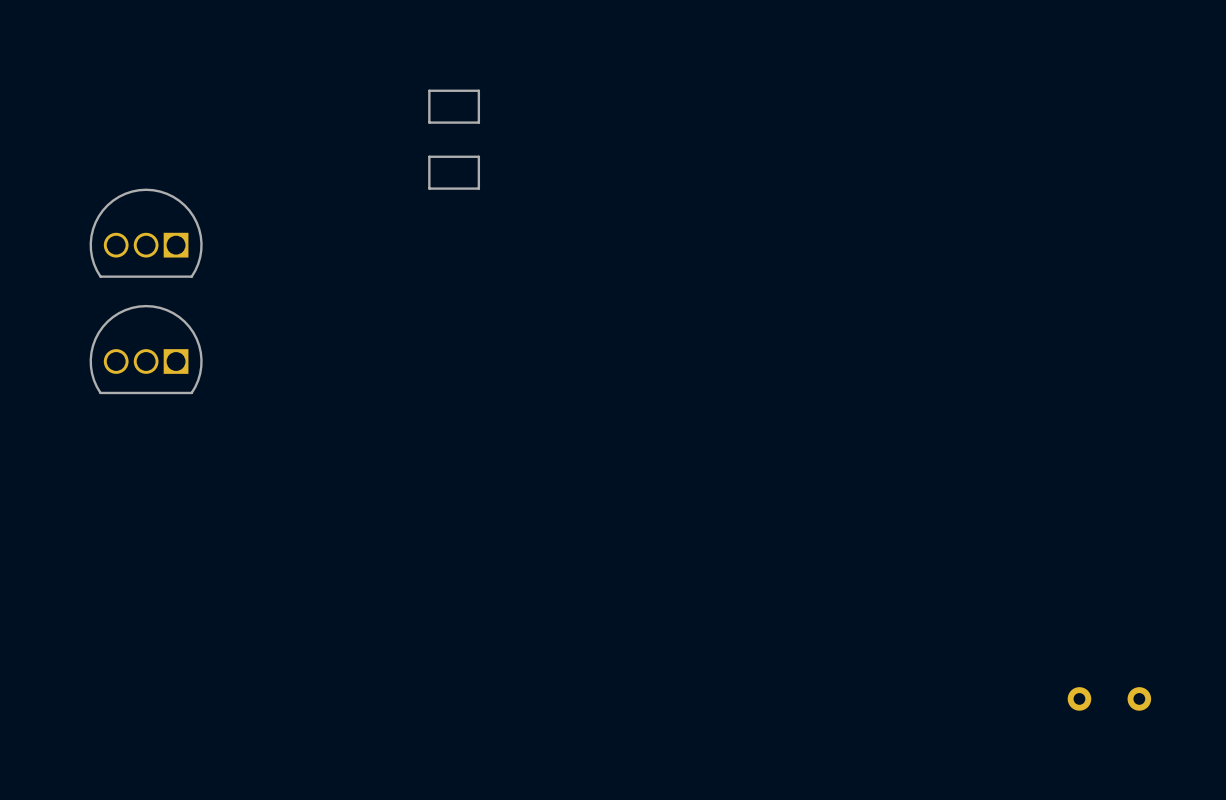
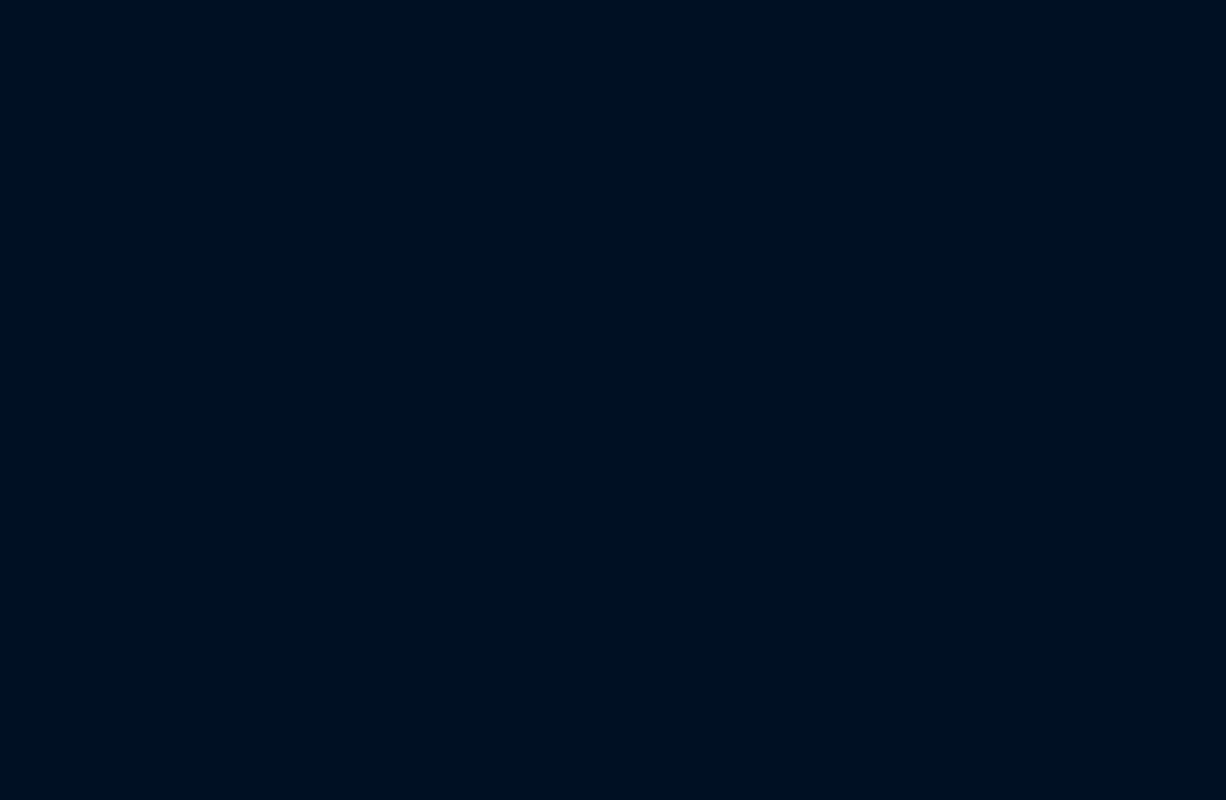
part: (454, 106) -> none
part: (454, 172) -> none
part: (146, 233) -> none
part: (146, 349) -> none
part: (1109, 698) -> none

